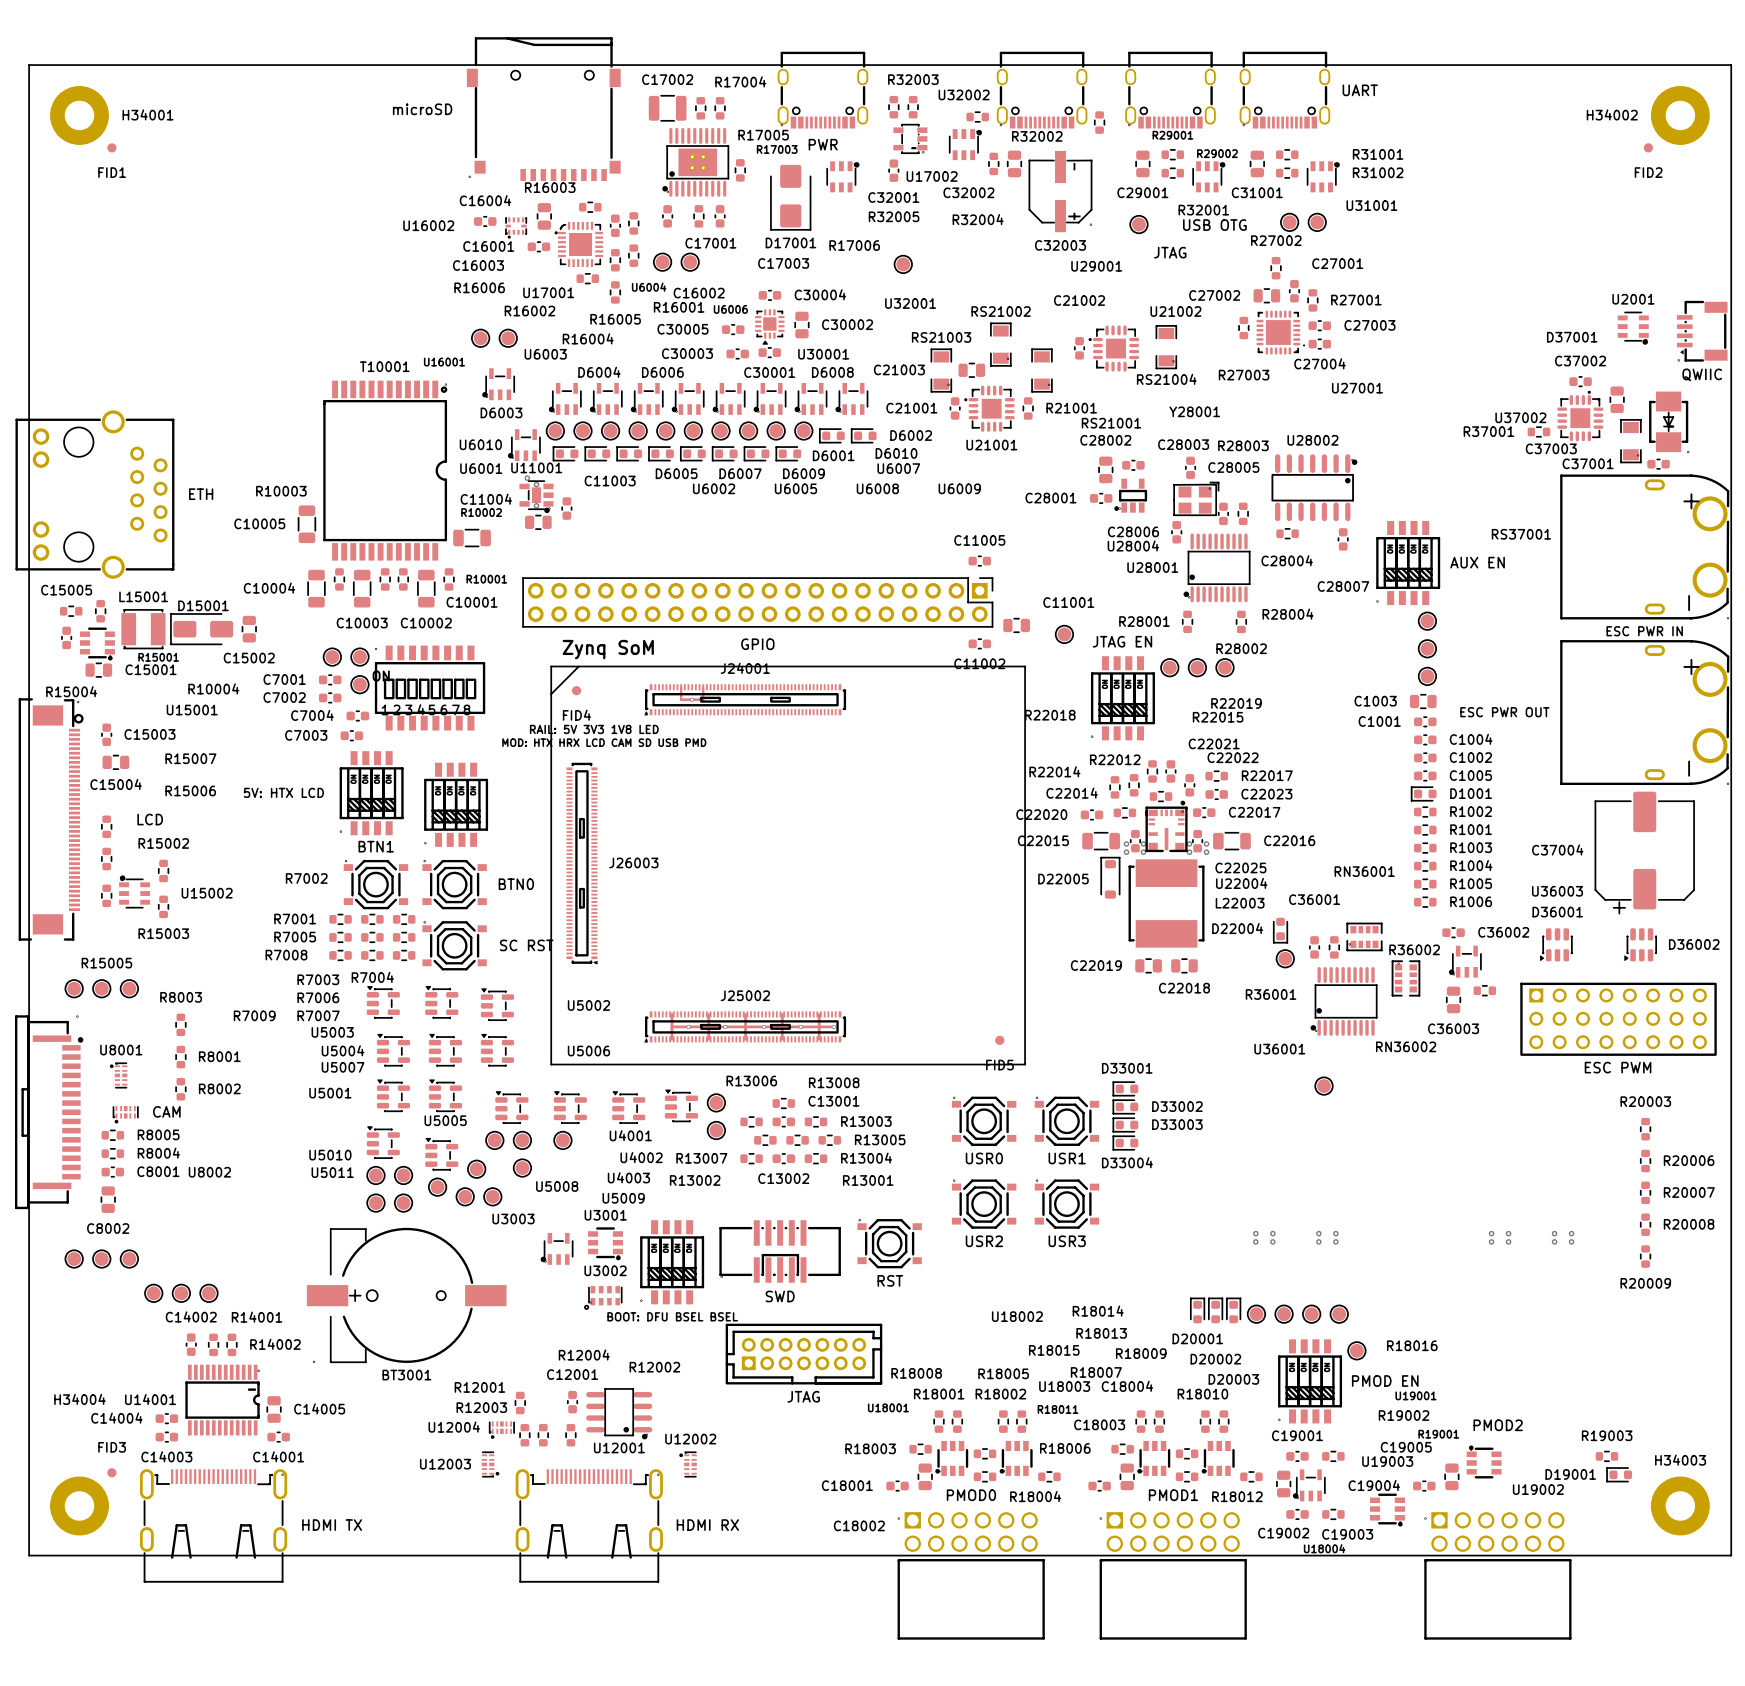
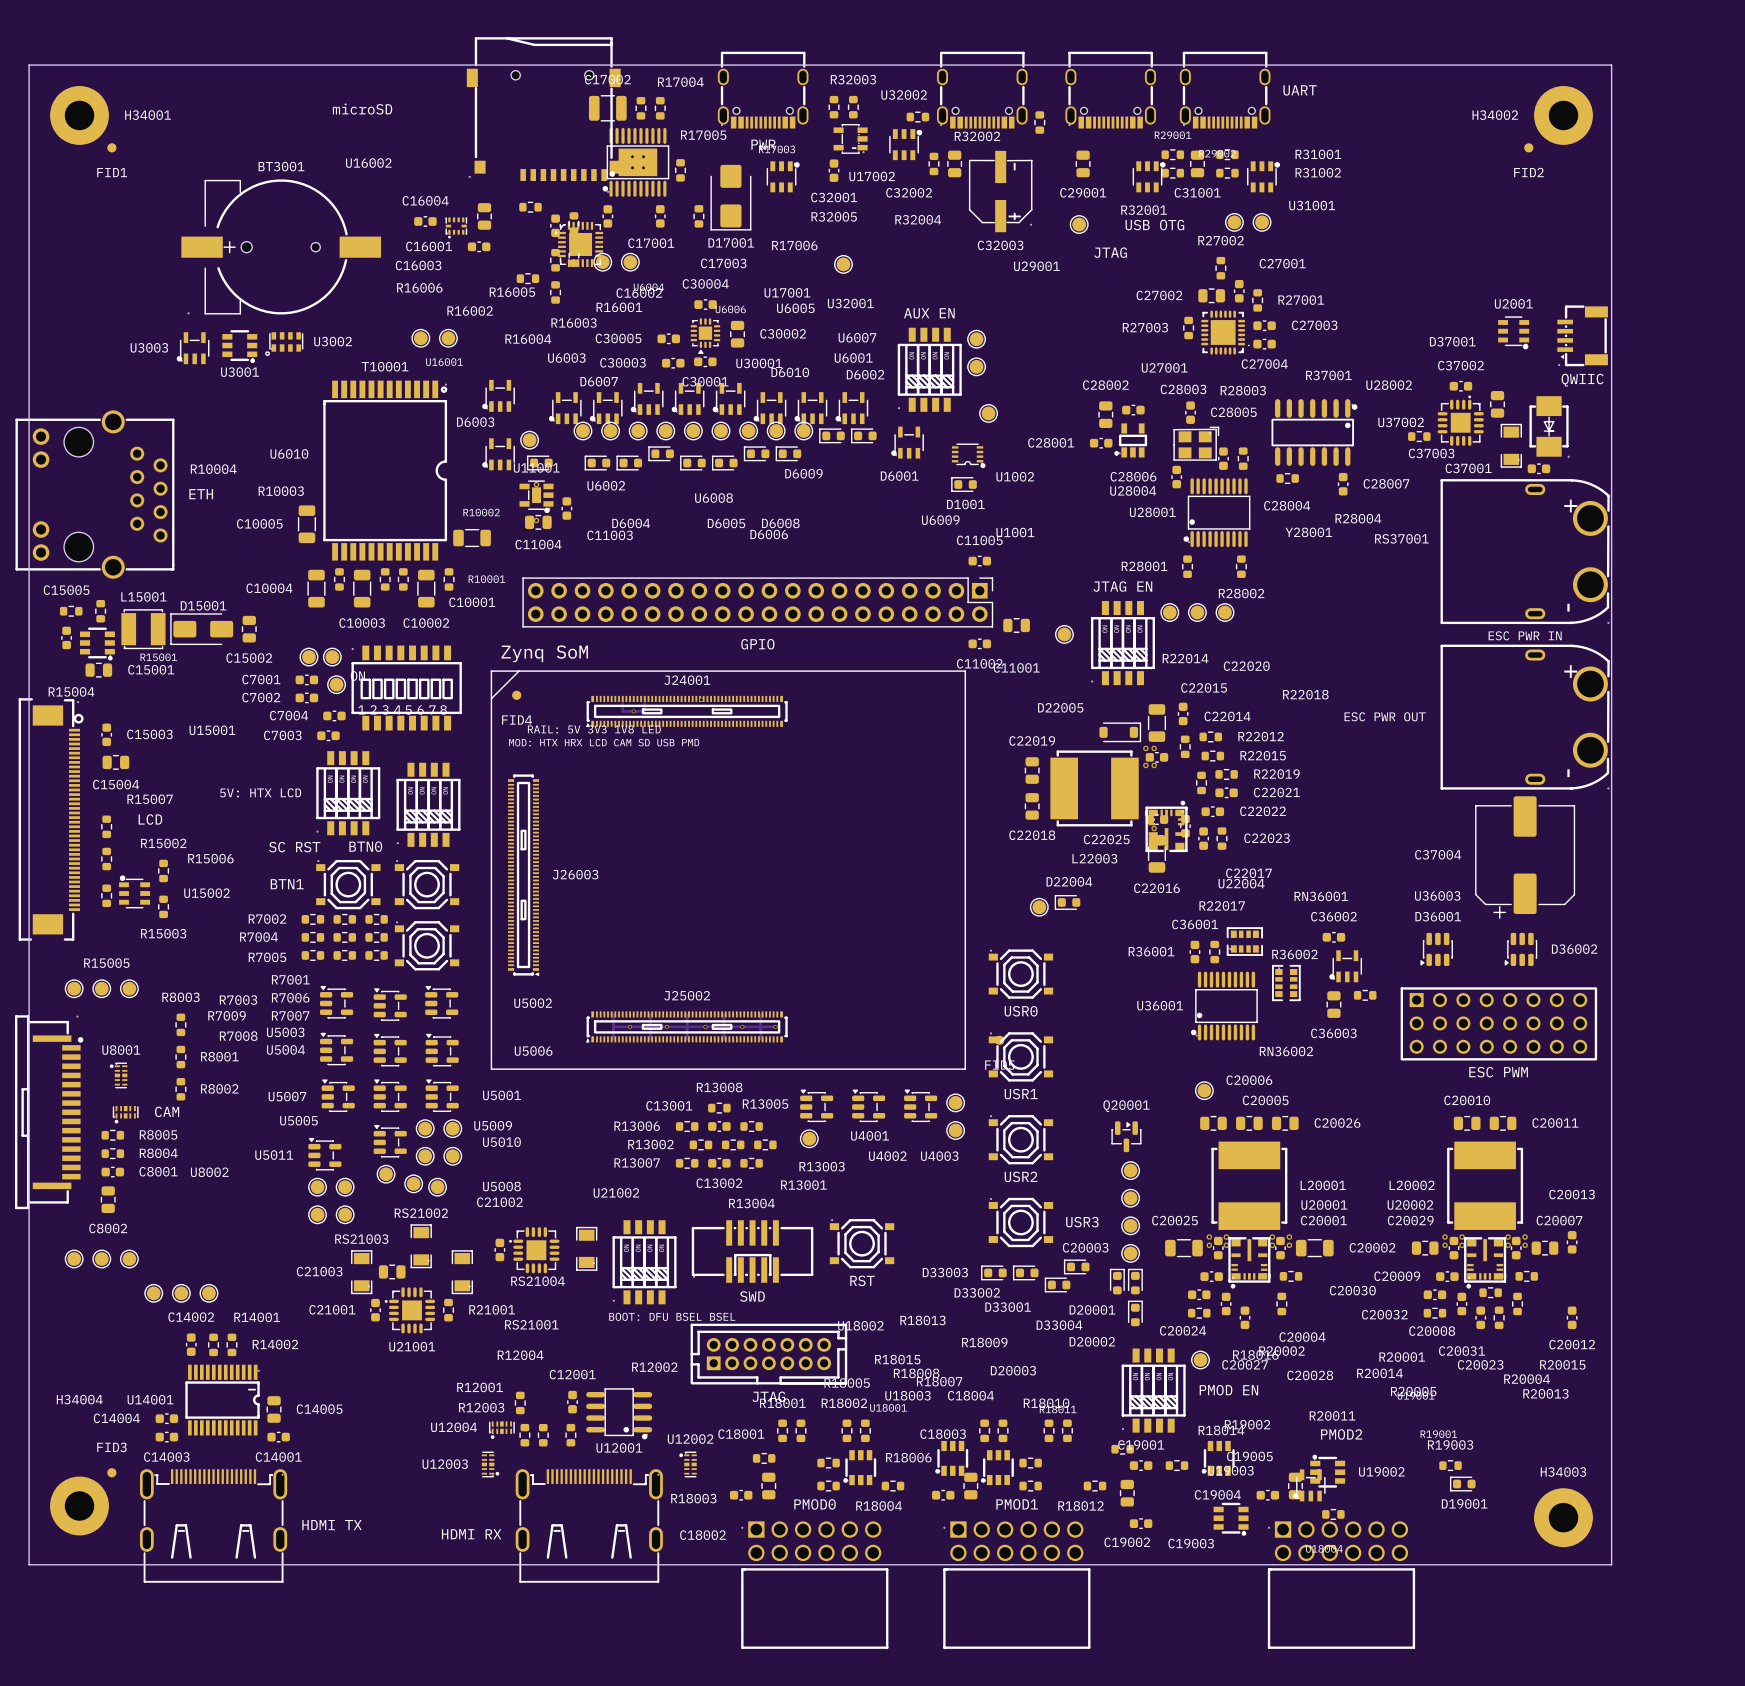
board edge: (1611, 65) (1731, 65) (1731, 1555) (29, 1555) -> (1611, 65) (1611, 1564) (29, 1564) (29, 1555)
part position: (822, 90) -> (763, 90)
part: none -> (982, 90)
part: (1042, 90) -> none
part: none -> (1110, 90)
part: (1170, 90) -> none
part: none -> (1225, 90)
part: (1284, 90) -> none
text position: UART (1360, 90) -> UART (1300, 90)
R32005 position: (893, 107) -> (834, 107)
R32003 position: (913, 107) -> (853, 107)
C17002 position: (667, 108) -> (607, 108)
R17006 position: (700, 108) -> (640, 108)
R17005 position: (720, 108) -> (660, 108)
text position: microSD (422, 109) -> microSD (362, 109)
H34002 position: (1680, 115) -> (1563, 115)
R32004 position: (977, 117) -> (917, 117)
R32001 position: (1099, 122) -> (1039, 122)
U32001 position: (910, 138) -> (850, 138)
text position: PWR (823, 144) -> PWR (763, 144)
U32002 position: (965, 144) -> (905, 144)
FID2 position: (1648, 147) -> (1528, 147)
R31001 position: (1287, 154) -> (1227, 154)
U17001 position: (695, 162) -> (635, 162)
R32002 position: (993, 163) -> (933, 163)
C32002 position: (1014, 163) -> (954, 163)
C29001 position: (1142, 163) -> (1083, 163)
C31001 position: (1257, 163) -> (1197, 163)
R17004 position: (740, 170) -> (680, 170)
C32001 position: (893, 170) -> (834, 170)
R31002 position: (1287, 173) -> (1227, 173)
U17002 position: (842, 176) -> (783, 176)
U29001 position: (1208, 176) -> (1149, 176)
U31001 position: (1323, 176) -> (1263, 176)
R16003 name position: R16003 (550, 187) -> R16003 (574, 322)
C32003 position: (1060, 191) -> (1000, 191)
D17001 position: (790, 197) -> (730, 197)
R16006 position: (590, 207) -> (530, 207)
C16003 position: (544, 216) -> (484, 216)
C17001 position: (667, 216) -> (607, 216)
C17003 position: (720, 216) -> (660, 216)
C16004 position: (485, 221) -> (425, 221)
part: none -> (1234, 222)
part: none -> (1262, 222)
part: (1289, 222) -> none
part: (1317, 222) -> none
R16002 position: (633, 223) -> (573, 223)
part: none -> (1079, 224)
part: (1138, 224) -> none
U16002 name position: U16002 (428, 225) -> U16002 (368, 163)
C16002 position: (615, 225) -> (555, 225)
text position: USB OTG (1214, 225) -> USB OTG (1154, 225)
U16002 position: (516, 227) -> (456, 227)
C16001 position: (538, 246) -> (479, 246)
text position: JTAG (1170, 252) -> JTAG (1110, 252)
R16003 position: (633, 255) -> (573, 255)
R16001 position: (615, 260) -> (555, 260)
part: none -> (602, 262)
part: none -> (630, 262)
part: (662, 262) -> none
part: (690, 262) -> none
part: none -> (843, 264)
part: (903, 264) -> none
R27002 position: (1276, 268) -> (1220, 268)
R16004 position: (587, 278) -> (527, 278)
C27001 position: (1294, 291) -> (1239, 291)
U17001 name position: U17001 (548, 292) -> U17001 (787, 292)
R16005 position: (615, 292) -> (555, 292)
C30004 name position: C30004 (820, 294) -> C30004 (705, 283)
C30004 position: (769, 295) -> (705, 304)
C27002 position: (1266, 295) -> (1211, 295)
R27001 position: (1312, 300) -> (1257, 300)
U21002 name position: U21002 (1175, 311) -> U21002 (616, 1192)
text: none -> AUX EN (929, 313)
R16005 name position: R16005 (615, 319) -> R16005 (512, 292)
C30002 position: (801, 325) -> (737, 334)
C27003 position: (1319, 325) -> (1264, 325)
U30001 position: (769, 326) -> (705, 336)
R27003 position: (1243, 328) -> (1188, 328)
U2001 position: (1633, 328) -> (1513, 332)
C30005 position: (733, 329) -> (668, 338)
part position: (1702, 331) -> (1582, 335)
U27001 position: (1280, 332) -> (1224, 332)
part: none -> (420, 338)
part: none -> (448, 338)
part: (480, 338) -> none
part: (508, 338) -> none
part: none -> (976, 339)
RS21002 position: (1000, 344) -> (421, 1246)
C27004 position: (1319, 344) -> (1264, 344)
RS21004 position: (1166, 347) -> (586, 1248)
C21002 position: (1079, 348) -> (499, 1249)
U21002 position: (1113, 348) -> (534, 1250)
C30001 position: (769, 352) -> (705, 361)
U6003 name position: U6003 (545, 354) -> U6003 (566, 357)
C30003 position: (737, 354) -> (673, 363)
part: none -> (976, 366)
part: none -> (929, 369)
RS21003 position: (941, 370) -> (361, 1272)
C21003 position: (971, 370) -> (392, 1271)
RS21001 position: (1041, 370) -> (462, 1272)
D6004 name position: D6004 (599, 372) -> D6004 (631, 523)
D6006 name position: D6006 (662, 372) -> D6006 (769, 534)
D6008 name position: D6008 (832, 372) -> D6008 (780, 523)
text position: QWIIC (1702, 374) -> QWIIC (1582, 380)
R27003 name position: R27003 (1244, 375) -> R27003 (1145, 327)
RS21004 name position: RS21004 (1166, 379) -> RS21004 (538, 1281)
C37002 position: (1580, 381) -> (1460, 386)
U6003 position: (498, 384) -> (565, 408)
U27001 name position: U27001 (1357, 388) -> U27001 (1164, 367)
U6001 position: (565, 398) -> (851, 408)
U6002 position: (606, 398) -> (498, 395)
U6008 position: (769, 398) -> (606, 408)
U6007 position: (810, 398) -> (769, 408)
U6009 position: (851, 398) -> (810, 408)
C37003 position: (1617, 399) -> (1497, 404)
C21001 position: (955, 408) -> (375, 1310)
U21001 position: (989, 408) -> (409, 1310)
R21001 position: (1028, 408) -> (448, 1310)
Y28001 name position: Y28001 (1194, 411) -> Y28001 (1308, 532)
part: none -> (988, 413)
U37002 position: (1580, 416) -> (1460, 420)
D37001 position: (1668, 422) -> (1549, 426)
part position: (555, 430) -> (529, 440)
R37001 name position: R37001 (1488, 431) -> R37001 (1328, 375)
R37001 position: (1538, 431) -> (1419, 436)
D6002 name position: D6002 (911, 435) -> D6002 (865, 374)
U28002 name position: U28002 (1312, 440) -> U28002 (1389, 385)
RS37001 position: (1630, 441) -> (1511, 445)
U1001: none -> (907, 442)
U6010 name position: U6010 (480, 444) -> U6010 (289, 453)
U6010 position: (524, 445) -> (498, 454)
D6003 position: (565, 453) -> (539, 462)
D6004 position: (597, 453) -> (629, 463)
D6005 position: (629, 453) -> (724, 463)
D6007 position: (693, 453) -> (597, 463)
D6008 position: (724, 453) -> (693, 463)
D6010 name position: D6010 (896, 453) -> D6010 (790, 372)
D6001 name position: D6001 (833, 455) -> D6001 (899, 476)
U1002: none -> (968, 455)
C37001 position: (1658, 464) -> (1538, 468)
C28003 position: (1133, 465) -> (1133, 410)
C28005 position: (1190, 467) -> (1190, 412)
U6001 name position: U6001 (481, 468) -> U6001 (853, 357)
U6007 name position: U6007 (898, 468) -> U6007 (857, 337)
C28002 position: (1105, 469) -> (1105, 414)
D6005 name position: D6005 (676, 473) -> D6005 (726, 523)
D6007 name position: D6007 (740, 473) -> D6007 (599, 381)
via: (527, 478) -> none
C11003 name position: C11003 (610, 480) -> C11003 (610, 535)
U28002 position: (1314, 487) -> (1314, 432)
U6005 name position: U6005 (795, 488) -> U6005 (795, 308)
U6009 name position: U6009 (959, 488) -> U6009 (940, 520)
U28004 position: (1130, 495) -> (1130, 440)
C28001 position: (1101, 498) -> (1101, 443)
Y28001 position: (1196, 498) -> (1196, 443)
C11004 name position: C11004 (486, 499) -> C11004 (538, 544)
via position: (536, 505) -> (536, 520)
C28004 position: (1223, 513) -> (1223, 458)
R28003 position: (1243, 513) -> (1243, 458)
C28006 position: (1176, 532) -> (1176, 477)
R28004 position: (1287, 533) -> (1287, 478)
C28007 position: (1343, 539) -> (1343, 484)
part: (1644, 546) -> none
part: none -> (1525, 551)
text: AUX EN (1477, 562) -> none
part: (1408, 563) -> none
U28001 position: (1216, 567) -> (1216, 512)
C28007 name position: C28007 (1343, 586) -> C28007 (1386, 483)
C11001 name position: C11001 (1068, 602) -> C11001 (1016, 667)
part: none -> (1169, 612)
part: none -> (1197, 612)
part: none -> (1225, 612)
R28004 name position: R28004 (1288, 614) -> R28004 (1358, 518)
R28001 position: (1187, 621) -> (1187, 566)
R28002 position: (1241, 621) -> (1241, 566)
part: (1427, 621) -> none
text position: ESC PWR IN (1644, 631) -> ESC PWR IN (1525, 635)
text position: JTAG EN (1122, 641) -> JTAG EN (1122, 586)
part: (1427, 648) -> none
text position: Zynq SoM (608, 649) -> Zynq SoM (544, 653)
part: none -> (308, 657)
part: (359, 657) -> none
line: (551, 666) (1025, 666) (1025, 1064) (551, 1064) (551, 666) -> (491, 671) (965, 671) (965, 1069) (491, 1069) (491, 671)
line: (578, 666) (551, 694) -> (519, 671) (491, 698)
part: (1169, 667) -> none
part: (1197, 667) -> none
part: (1225, 667) -> none
part: (1427, 676) -> none
C7001 position: (330, 679) -> (306, 679)
part: none -> (336, 684)
part: (359, 684) -> none
track: (681, 687) (681, 699) (703, 699) (703, 687) -> (622, 698) (622, 711) (644, 711) (644, 698)
R10004 name position: R10004 (213, 688) -> R10004 (213, 469)
part position: (430, 688) -> (406, 688)
FID4 position: (576, 690) -> (516, 695)
C7002 position: (330, 697) -> (306, 697)
part position: (1122, 698) -> (1122, 643)
via: (692, 699) -> none
J24001 position: (745, 699) -> (686, 711)
C1003: (1423, 701) -> none
R22019 name position: R22019 (1236, 703) -> R22019 (1276, 774)
U15001 name position: U15001 (192, 710) -> U15001 (212, 730)
via: none -> (633, 711)
text position: ESC PWR OUT (1504, 712) -> ESC PWR OUT (1385, 716)
part: (1644, 712) -> none
C7004 position: (357, 715) -> (334, 715)
R22018 name position: R22018 (1050, 715) -> R22018 (1305, 694)
R22015 name position: R22015 (1218, 717) -> R22015 (1263, 755)
part: none -> (1525, 717)
C1001: (1425, 721) -> none
C7003 position: (351, 735) -> (328, 735)
C1004: (1425, 739) -> none
C22021 name position: C22021 (1214, 743) -> C22021 (1276, 792)
via: none -> (1145, 748)
via: none -> (1154, 748)
C22022 name position: C22022 (1233, 757) -> C22022 (1263, 811)
C1002: (1425, 757) -> none
R15007 name position: R15007 (190, 758) -> R15007 (150, 799)
R22012 name position: R22012 (1115, 759) -> R22012 (1261, 736)
via: none -> (1145, 765)
via: none -> (1154, 765)
R22014 name position: R22014 (1054, 771) -> R22014 (1185, 658)
R22019 rotation: 0° (1152, 771) -> 90° clockwise (1226, 774)
R22019 position: (1152, 771) -> (1226, 774)
C22021 rotation: 0° (1170, 771) -> 90° clockwise (1226, 792)
C22021 position: (1170, 771) -> (1226, 792)
C1005: (1425, 775) -> none
R22017 rotation: 0° (1216, 776) -> 90° clockwise (1222, 838)
R22017 position: (1216, 776) -> (1222, 838)
R22015 rotation: 0° (1134, 785) -> 90° clockwise (1212, 756)
R22015 position: (1134, 785) -> (1212, 756)
C22022 rotation: 0° (1189, 785) -> 90° clockwise (1212, 811)
C22022 position: (1189, 785) -> (1212, 811)
R22012 rotation: 0° (1115, 787) -> 90° clockwise (1210, 736)
R22012 position: (1115, 787) -> (1210, 736)
R15006 name position: R15006 (190, 790) -> R15006 (210, 858)
text position: 5V: HTX LCD (283, 792) -> 5V: HTX LCD (260, 792)
part position: (371, 793) -> (348, 793)
C22014 name position: C22014 (1072, 793) -> C22014 (1227, 716)
D1001 position: (1423, 793) -> (964, 484)
D1001 name position: D1001 (1471, 793) -> D1001 (965, 504)
C22023 rotation: 0° (1216, 794) -> 90° clockwise (1203, 838)
C22023 position: (1216, 794) -> (1203, 838)
R22018 rotation: 0° (1161, 796) -> 90° clockwise (1201, 782)
R22018 position: (1161, 796) -> (1201, 782)
part position: (456, 804) -> (428, 804)
R22014 rotation: 0° (1124, 812) -> 90° clockwise (1185, 746)
R22014 position: (1124, 812) -> (1185, 746)
C22017 rotation: 0° (1204, 812) -> 90° clockwise (1185, 826)
C22017 position: (1204, 812) -> (1185, 826)
C22017 name position: C22017 (1254, 812) -> C22017 (1248, 873)
R1002: (1425, 812) -> none
C22020 name position: C22020 (1041, 814) -> C22020 (1246, 666)
C22020 rotation: 0° (1092, 814) -> 90° clockwise (1183, 713)
C22020 position: (1092, 814) -> (1183, 713)
via: none -> (1154, 828)
R1001: (1425, 830) -> none
C22015 name position: C22015 (1043, 840) -> C22015 (1204, 687)
C22016 name position: C22016 (1289, 840) -> C22016 (1157, 888)
C22015 rotation: 0° (1101, 841) -> 90° clockwise (1156, 723)
C22015 position: (1101, 841) -> (1156, 723)
C22014 rotation: 0° (1135, 841) -> 90° clockwise (1156, 757)
C22014 position: (1135, 841) -> (1156, 757)
C22025 rotation: 0° (1197, 841) -> 90° clockwise (1156, 819)
C22025 position: (1197, 841) -> (1156, 819)
C22016 rotation: 0° (1231, 841) -> 90° clockwise (1156, 853)
C22016 position: (1231, 841) -> (1156, 853)
via: (1126, 843) -> none
via: (1143, 843) -> none
via: (1189, 843) -> none
via: (1206, 843) -> none
text position: BTN1 (376, 846) -> BTN1 (287, 884)
text: none -> SC RST (294, 847)
R1003: (1425, 848) -> none
via: (1126, 852) -> none
via: (1143, 852) -> none
via: (1189, 852) -> none
via: (1206, 852) -> none
C37004 position: (1644, 852) -> (1525, 857)
J26003 position: (582, 863) -> (523, 875)
R1004: (1425, 866) -> none
C22025 name position: C22025 (1240, 867) -> C22025 (1106, 839)
RN36001 name position: RN36001 (1364, 871) -> RN36001 (1321, 896)
D22005 rotation: 0° (1110, 877) -> 90° clockwise (1120, 732)
D22005 position: (1110, 877) -> (1120, 732)
R7002 name position: R7002 (306, 878) -> R7002 (267, 919)
D22005 name position: D22005 (1063, 879) -> D22005 (1060, 707)
part: none -> (348, 884)
part: (375, 884) -> none
part: none -> (427, 884)
part: (454, 884) -> none
text position: BTN0 (516, 884) -> BTN0 (365, 846)
R1005: (1425, 884) -> none
C36001 name position: C36001 (1314, 899) -> C36001 (1195, 924)
R1006: (1425, 902) -> none
L22003 rotation: 0° (1166, 903) -> 90° clockwise (1094, 788)
L22003 position: (1166, 903) -> (1094, 788)
part: none -> (1039, 907)
R7001 name position: R7001 (295, 919) -> R7001 (290, 979)
R7001 position: (340, 919) -> (376, 919)
R7002 position: (372, 919) -> (312, 919)
R7003 position: (404, 919) -> (344, 919)
D22004 name position: D22004 (1237, 928) -> D22004 (1069, 881)
D22004 rotation: 0° (1280, 930) -> 90° clockwise (1067, 902)
D22004 position: (1280, 930) -> (1067, 902)
C36002 position: (1453, 932) -> (1333, 937)
C36002 name position: C36002 (1503, 932) -> C36002 (1333, 916)
RN36001 position: (1364, 936) -> (1244, 941)
R7005 name position: R7005 (295, 937) -> R7005 (267, 957)
R7005 position: (340, 937) -> (312, 937)
R7004 position: (372, 937) -> (344, 937)
R7006 position: (404, 937) -> (376, 937)
D36001 position: (1556, 944) -> (1436, 949)
D36002 position: (1640, 944) -> (1520, 949)
part position: (454, 945) -> (427, 945)
text: SC RST (526, 945) -> none
C36001 position: (1314, 947) -> (1194, 952)
R36001 position: (1334, 947) -> (1214, 952)
R7008 name position: R7008 (286, 955) -> R7008 (238, 1036)
R7009 position: (340, 955) -> (312, 955)
R7008 position: (372, 955) -> (344, 955)
R7007 position: (404, 955) -> (376, 955)
part: (1285, 958) -> none
U36003 position: (1465, 961) -> (1345, 966)
C22019 name position: C22019 (1096, 965) -> C22019 (1032, 740)
C22019 rotation: 0° (1148, 965) -> 90° clockwise (1032, 770)
C22019 position: (1148, 965) -> (1032, 770)
C22018 rotation: 0° (1184, 965) -> 90° clockwise (1032, 806)
C22018 position: (1184, 965) -> (1032, 806)
part: none -> (1020, 974)
R7004 name position: R7004 (372, 977) -> R7004 (259, 937)
RN36002 position: (1405, 978) -> (1286, 983)
R7003 name position: R7003 (318, 979) -> R7003 (238, 1000)
R36002 position: (1484, 990) -> (1365, 995)
R36001 name position: R36001 (1271, 994) -> R36001 (1151, 951)
C36003 position: (1453, 999) -> (1333, 1004)
U36001 position: (1343, 1001) -> (1224, 1006)
U5003 position: (383, 1002) -> (336, 1002)
U5001: none -> (390, 1004)
U5002: (497, 1004) -> none
track: (671, 1014) (671, 1039) -> (613, 1014) (613, 1039)
track: (708, 1014) (708, 1039) -> (650, 1014) (650, 1039)
track: (745, 1014) (745, 1039) -> (687, 1014) (687, 1039)
track: (782, 1014) (782, 1039) -> (723, 1014) (723, 1039)
track: (819, 1014) (819, 1039) -> (760, 1014) (760, 1039)
part position: (1618, 1019) -> (1498, 1023)
via: none -> (630, 1026)
via: none -> (666, 1026)
via: (688, 1026) -> none
via: none -> (705, 1026)
via: (725, 1026) -> none
via: none -> (742, 1026)
J25002 position: (745, 1026) -> (686, 1026)
via: (763, 1026) -> none
track: (775, 1026) (833, 1026) -> (613, 1026) (671, 1026)
via: none -> (775, 1026)
via: (800, 1026) -> none
via: (833, 1026) -> none
U36001 name position: U36001 (1279, 1049) -> U36001 (1160, 1005)
U5004 position: (393, 1050) -> (336, 1048)
U5005 position: (445, 1050) -> (390, 1050)
U5006 position: (497, 1050) -> (442, 1050)
part: none -> (1020, 1056)
U5007 name position: U5007 (343, 1067) -> U5007 (287, 1096)
text position: ESC PWM (1618, 1067) -> ESC PWM (1498, 1072)
D33001 name position: D33001 (1127, 1068) -> D33001 (1008, 1307)
R13006 name position: R13006 (751, 1081) -> R13006 (637, 1126)
R13008 name position: R13008 (834, 1082) -> R13008 (719, 1087)
part: (1324, 1086) -> none
D33001 position: (1125, 1088) -> (1076, 1266)
part: none -> (1204, 1090)
U5001 name: U5001 (330, 1093) -> U5002 (533, 1003)
U5007 position: (393, 1095) -> (338, 1095)
U5008 position: (445, 1095) -> (390, 1095)
C13001 name position: C13001 (833, 1101) -> C13001 (669, 1105)
part: (716, 1102) -> none
part: none -> (955, 1102)
R13008 position: (783, 1103) -> (719, 1108)
U4001 position: (681, 1105) -> (920, 1105)
D33002 position: (1125, 1106) -> (1025, 1272)
D33002 name position: D33002 (1177, 1106) -> D33002 (977, 1292)
U5009 position: (511, 1107) -> (442, 1095)
U4002 position: (570, 1107) -> (816, 1105)
U4003 position: (628, 1107) -> (868, 1105)
U5005 name position: U5005 (445, 1120) -> U5005 (298, 1120)
R13006 position: (751, 1121) -> (687, 1126)
C13001 position: (783, 1121) -> (719, 1126)
R13003 position: (815, 1121) -> (751, 1126)
R13003 name position: R13003 (866, 1121) -> R13003 (822, 1166)
part: (984, 1121) -> none
part: (1066, 1121) -> none
C20005: none -> (1213, 1123)
C20006: none -> (1249, 1123)
C20026: none -> (1285, 1123)
C20010: none -> (1467, 1123)
C20011: none -> (1503, 1123)
D33003 position: (1125, 1124) -> (993, 1272)
D33003 name position: D33003 (1177, 1124) -> D33003 (945, 1272)
part: none -> (425, 1128)
part: none -> (452, 1128)
R20003: (1645, 1129) -> none
part: (716, 1130) -> none
part: none -> (955, 1130)
Q20001: none -> (1126, 1136)
part: none -> (809, 1138)
R13005 name position: R13005 (880, 1139) -> R13005 (765, 1104)
part: none -> (1020, 1139)
part: (494, 1140) -> none
part: (522, 1140) -> none
part: (562, 1140) -> none
R13002 position: (765, 1140) -> (700, 1144)
R13001 position: (797, 1140) -> (733, 1144)
R13005 position: (829, 1140) -> (765, 1144)
U5011 position: (383, 1142) -> (324, 1154)
D33004 position: (1125, 1143) -> (1057, 1284)
U5010 position: (441, 1154) -> (390, 1141)
U5010 name position: U5010 (330, 1155) -> U5010 (501, 1142)
part: none -> (425, 1156)
part: none -> (452, 1156)
R13007 position: (751, 1158) -> (687, 1163)
C13002 position: (783, 1158) -> (719, 1163)
R13004 position: (815, 1158) -> (751, 1163)
R13004 name position: R13004 (866, 1158) -> R13004 (751, 1203)
text position: USR0 (984, 1158) -> USR0 (1021, 1011)
text position: USR1 (1067, 1158) -> USR1 (1021, 1094)
R20006: (1645, 1161) -> none
D33004 name position: D33004 (1127, 1162) -> D33004 (1059, 1325)
part: (522, 1168) -> none
part: (476, 1169) -> none
part: none -> (1130, 1170)
U5011 name position: U5011 (332, 1172) -> U5011 (274, 1155)
part: none -> (386, 1174)
part: (375, 1175) -> none
part: (403, 1175) -> none
U4003 name position: U4003 (628, 1177) -> U4003 (939, 1156)
R13002 name position: R13002 (695, 1180) -> R13002 (650, 1144)
part: none -> (413, 1183)
L20001: none -> (1249, 1185)
L20002: none -> (1485, 1185)
part: none -> (317, 1187)
part: none -> (345, 1187)
R20007: (1645, 1192) -> none
part: (465, 1196) -> none
part: (492, 1196) -> none
U5009 name position: U5009 (623, 1198) -> U5009 (493, 1125)
part: none -> (1130, 1198)
part: (375, 1203) -> none
part: (403, 1203) -> none
part: (984, 1204) -> none
part: (1066, 1204) -> none
part: none -> (317, 1214)
part: none -> (345, 1214)
U3001 name position: U3001 (605, 1215) -> U3001 (240, 372)
U3003 name position: U3003 (513, 1218) -> U3003 (149, 347)
part: none -> (1020, 1222)
R20008: (1645, 1224) -> none
part: none -> (1130, 1225)
via: (1255, 1233) -> none
via: (1272, 1233) -> none
via: (1318, 1233) -> none
via: (1335, 1233) -> none
via: (1491, 1233) -> none
via: (1508, 1233) -> none
via: (1554, 1233) -> none
via: (1571, 1233) -> none
via: none -> (1209, 1237)
via: none -> (1226, 1237)
via: none -> (1272, 1237)
via: none -> (1289, 1237)
via: none -> (1445, 1237)
via: none -> (1462, 1237)
via: none -> (1508, 1237)
via: none -> (1525, 1237)
text position: USR2 (984, 1241) -> USR2 (1021, 1176)
text position: USR3 (1067, 1241) -> USR3 (1082, 1222)
via: (1255, 1241) -> none
via: (1272, 1241) -> none
via: (1318, 1241) -> none
via: (1335, 1241) -> none
via: (1491, 1241) -> none
via: (1508, 1241) -> none
via: (1554, 1241) -> none
via: (1571, 1241) -> none
C20013: none -> (1572, 1242)
U3001 position: (605, 1243) -> (239, 346)
part position: (889, 1243) -> (862, 1243)
via: none -> (1209, 1245)
via: none -> (1226, 1245)
via: none -> (1272, 1245)
via: none -> (1289, 1245)
via: none -> (1445, 1245)
via: none -> (1462, 1245)
via: none -> (1508, 1245)
via: none -> (1525, 1245)
U3003 position: (556, 1248) -> (193, 348)
C20003: none -> (1183, 1248)
C20025: none -> (1218, 1248)
C20001: none -> (1280, 1248)
C20002: none -> (1314, 1248)
C20030: none -> (1425, 1248)
C20029: none -> (1454, 1248)
C20007: none -> (1516, 1248)
C20008: none -> (1545, 1248)
part position: (780, 1251) -> (752, 1251)
part: none -> (1130, 1253)
R20009: (1645, 1256) -> none
part position: (672, 1262) -> (644, 1262)
U20001: none -> (1249, 1262)
U20002: none -> (1485, 1262)
U3002 name position: U3002 (605, 1270) -> U3002 (333, 341)
C20004: none -> (1211, 1276)
R20001: none -> (1291, 1276)
C20009: none -> (1447, 1276)
R20004: none -> (1526, 1276)
text position: RST (890, 1280) -> RST (862, 1280)
R20014: none -> (1490, 1292)
C20028: none -> (1199, 1294)
C20032: none -> (1434, 1294)
BT3001 position: (406, 1295) -> (281, 246)
text position: SWD (780, 1296) -> SWD (752, 1296)
U3002 position: (603, 1297) -> (284, 343)
C20024: none -> (1226, 1303)
R20002: none -> (1281, 1303)
C20031: none -> (1461, 1303)
R20005: none -> (1517, 1303)
D20001 position: (1197, 1310) -> (1135, 1281)
D20002 position: (1215, 1310) -> (1135, 1313)
D20003 position: (1233, 1310) -> (1117, 1281)
R18014 name position: R18014 (1098, 1311) -> R18014 (1221, 1430)
R20011: none -> (1199, 1313)
R20013: none -> (1434, 1313)
part: (1256, 1314) -> none
part: (1284, 1314) -> none
part: (1311, 1314) -> none
part: (1339, 1314) -> none
C20027: none -> (1245, 1317)
C20023: none -> (1480, 1317)
R20015: none -> (1499, 1317)
C20012: none -> (1572, 1317)
R18013 name position: R18013 (1101, 1333) -> R18013 (922, 1320)
D20001 name position: D20001 (1197, 1338) -> D20001 (1092, 1309)
part: (1356, 1350) -> none
R18009 name position: R18009 (1141, 1353) -> R18009 (984, 1342)
part position: (803, 1354) -> (768, 1354)
R12004 name position: R12004 (584, 1355) -> R12004 (520, 1355)
D20002 name position: D20002 (1215, 1359) -> D20002 (1092, 1341)
part: none -> (1200, 1360)
BT3001 name position: BT3001 (406, 1375) -> BT3001 (281, 166)
D20003 name position: D20003 (1233, 1379) -> D20003 (1013, 1370)
part position: (1310, 1381) -> (1153, 1390)
text position: PMOD EN (1385, 1381) -> PMOD EN (1228, 1390)
text position: JTAG (803, 1396) -> JTAG (768, 1396)
R18001 position: (938, 1421) -> (782, 1430)
R18002 position: (957, 1421) -> (800, 1430)
R18005 position: (1003, 1421) -> (846, 1430)
R18006 position: (1021, 1421) -> (865, 1430)
R18009 position: (1141, 1421) -> (984, 1430)
R18010 position: (1159, 1421) -> (1003, 1430)
R18013 position: (1205, 1421) -> (1049, 1430)
R18014 position: (1223, 1421) -> (1067, 1430)
text position: PMOD2 (1498, 1425) -> PMOD2 (1341, 1434)
R18003 name position: R18003 (870, 1448) -> R18003 (693, 1498)
R18003 position: (920, 1449) -> (764, 1458)
R18007 position: (984, 1453) -> (828, 1463)
R18015 position: (1187, 1453) -> (1030, 1463)
C19001 position: (1297, 1456) -> (1141, 1465)
R19002 position: (1333, 1456) -> (1176, 1465)
R19003 position: (1606, 1456) -> (1450, 1465)
U18002 position: (1016, 1458) -> (859, 1467)
U18003 position: (1153, 1458) -> (997, 1467)
U19002 position: (1484, 1461) -> (1327, 1471)
D19001 name position: D19001 (1570, 1474) -> D19001 (1464, 1503)
D19001 position: (1619, 1474) -> (1462, 1484)
C18002 position: (925, 1476) -> (768, 1486)
R18004 position: (984, 1476) -> (828, 1486)
R18008 position: (1049, 1476) -> (892, 1486)
C18004 position: (1127, 1476) -> (970, 1486)
R18012 position: (1187, 1476) -> (1030, 1486)
R18016 position: (1251, 1476) -> (1095, 1486)
C19005 position: (1451, 1476) -> (1295, 1486)
C19002 position: (1283, 1484) -> (1127, 1493)
C18001 name position: C18001 (847, 1485) -> C18001 (741, 1434)
C18001 position: (897, 1486) -> (741, 1495)
C18003 position: (1099, 1486) -> (943, 1495)
C19004 position: (1424, 1486) -> (1267, 1495)
U19002 name position: U19002 (1538, 1489) -> U19002 (1381, 1471)
text position: PMOD0 (971, 1495) -> PMOD0 (815, 1504)
text position: PMOD1 (1173, 1495) -> PMOD1 (1017, 1504)
H34003 position: (1680, 1505) -> (1563, 1517)
U19003 position: (1387, 1510) -> (1231, 1519)
C19003 position: (1297, 1514) -> (1141, 1523)
text: HDMI RX (707, 1525) -> none
text: none -> HDMI RX (471, 1534)
part position: (971, 1575) -> (1016, 1585)
part: (1173, 1575) -> none
part: (1497, 1575) -> none
part: none -> (814, 1585)
part: none -> (1341, 1585)

